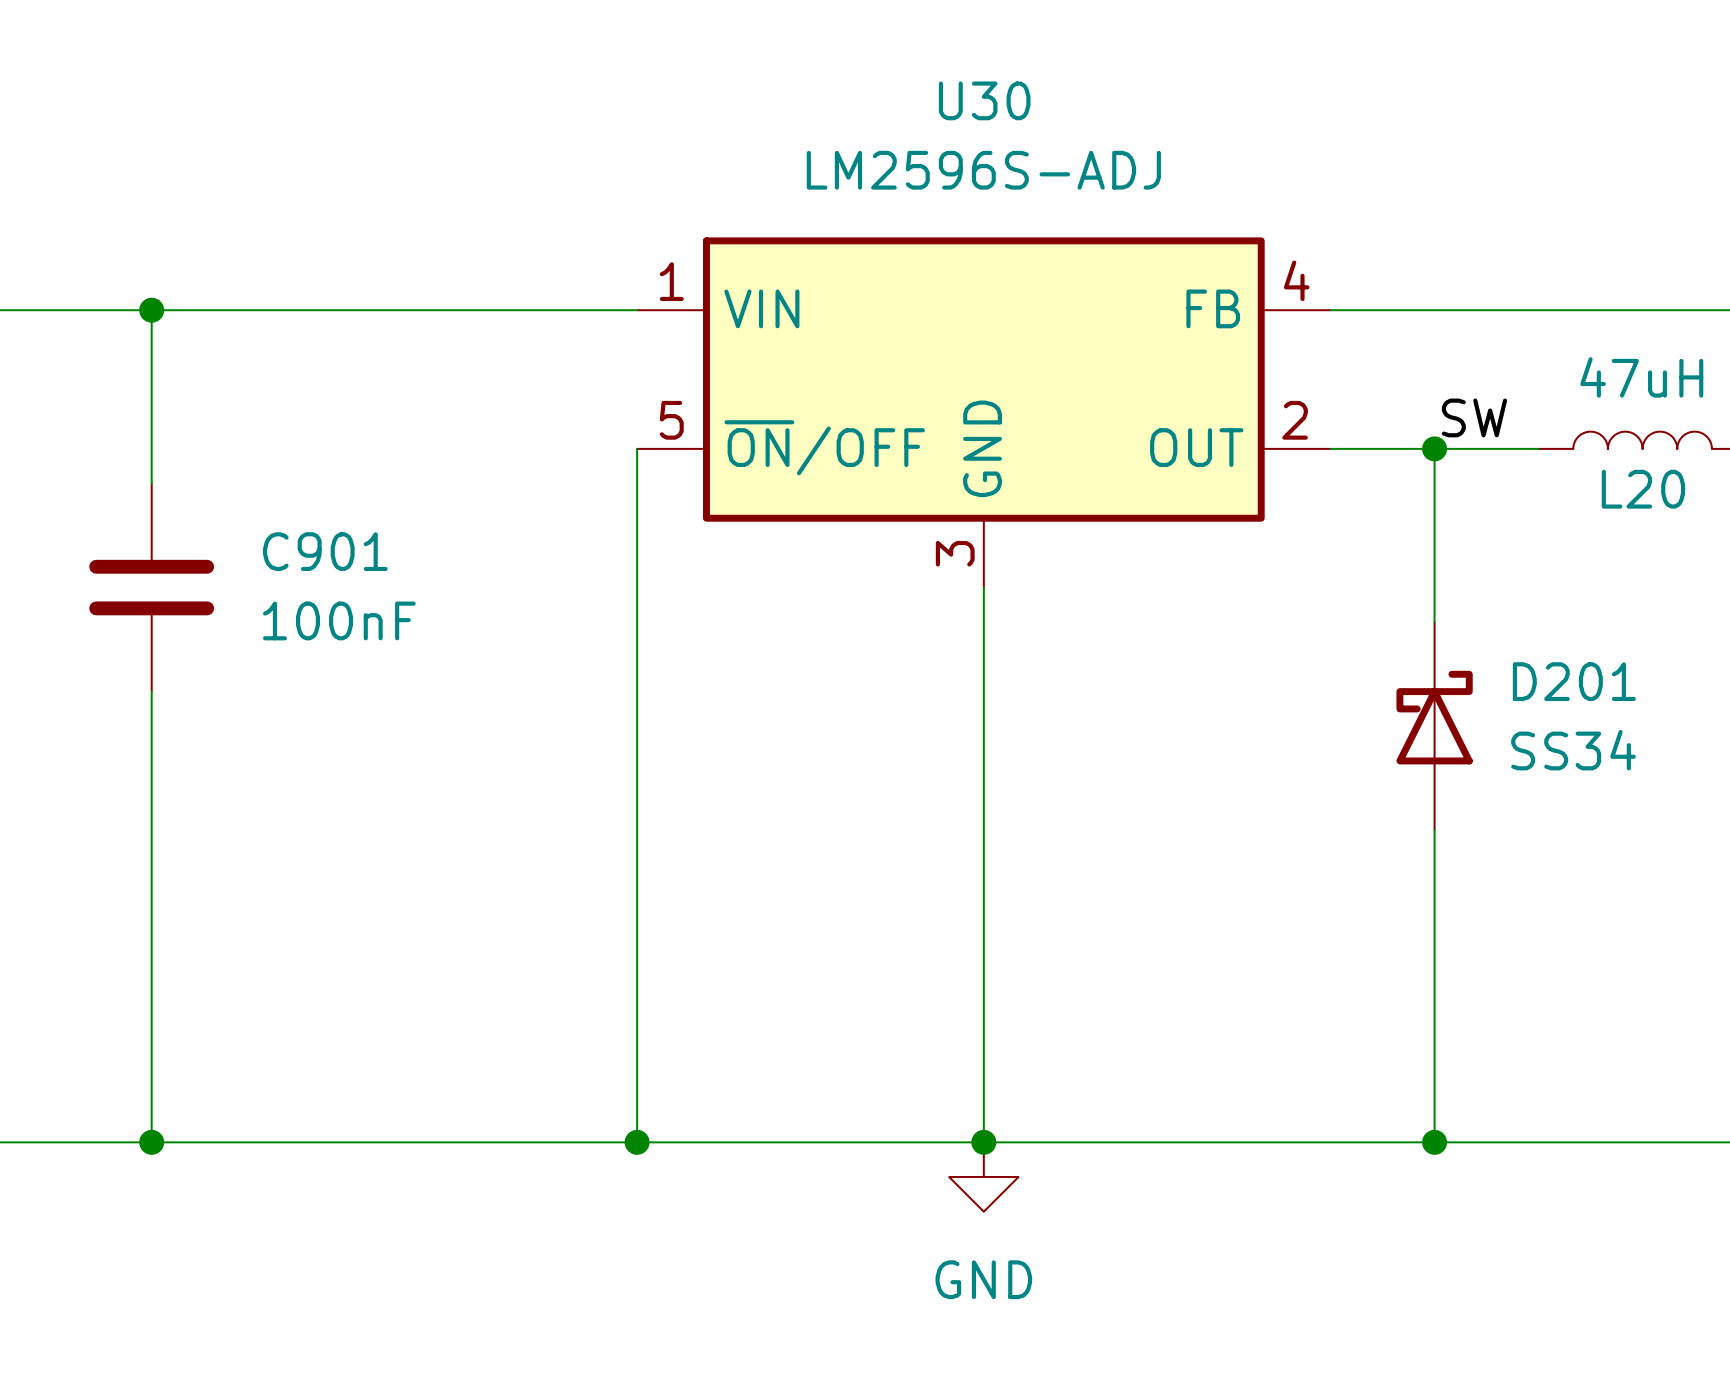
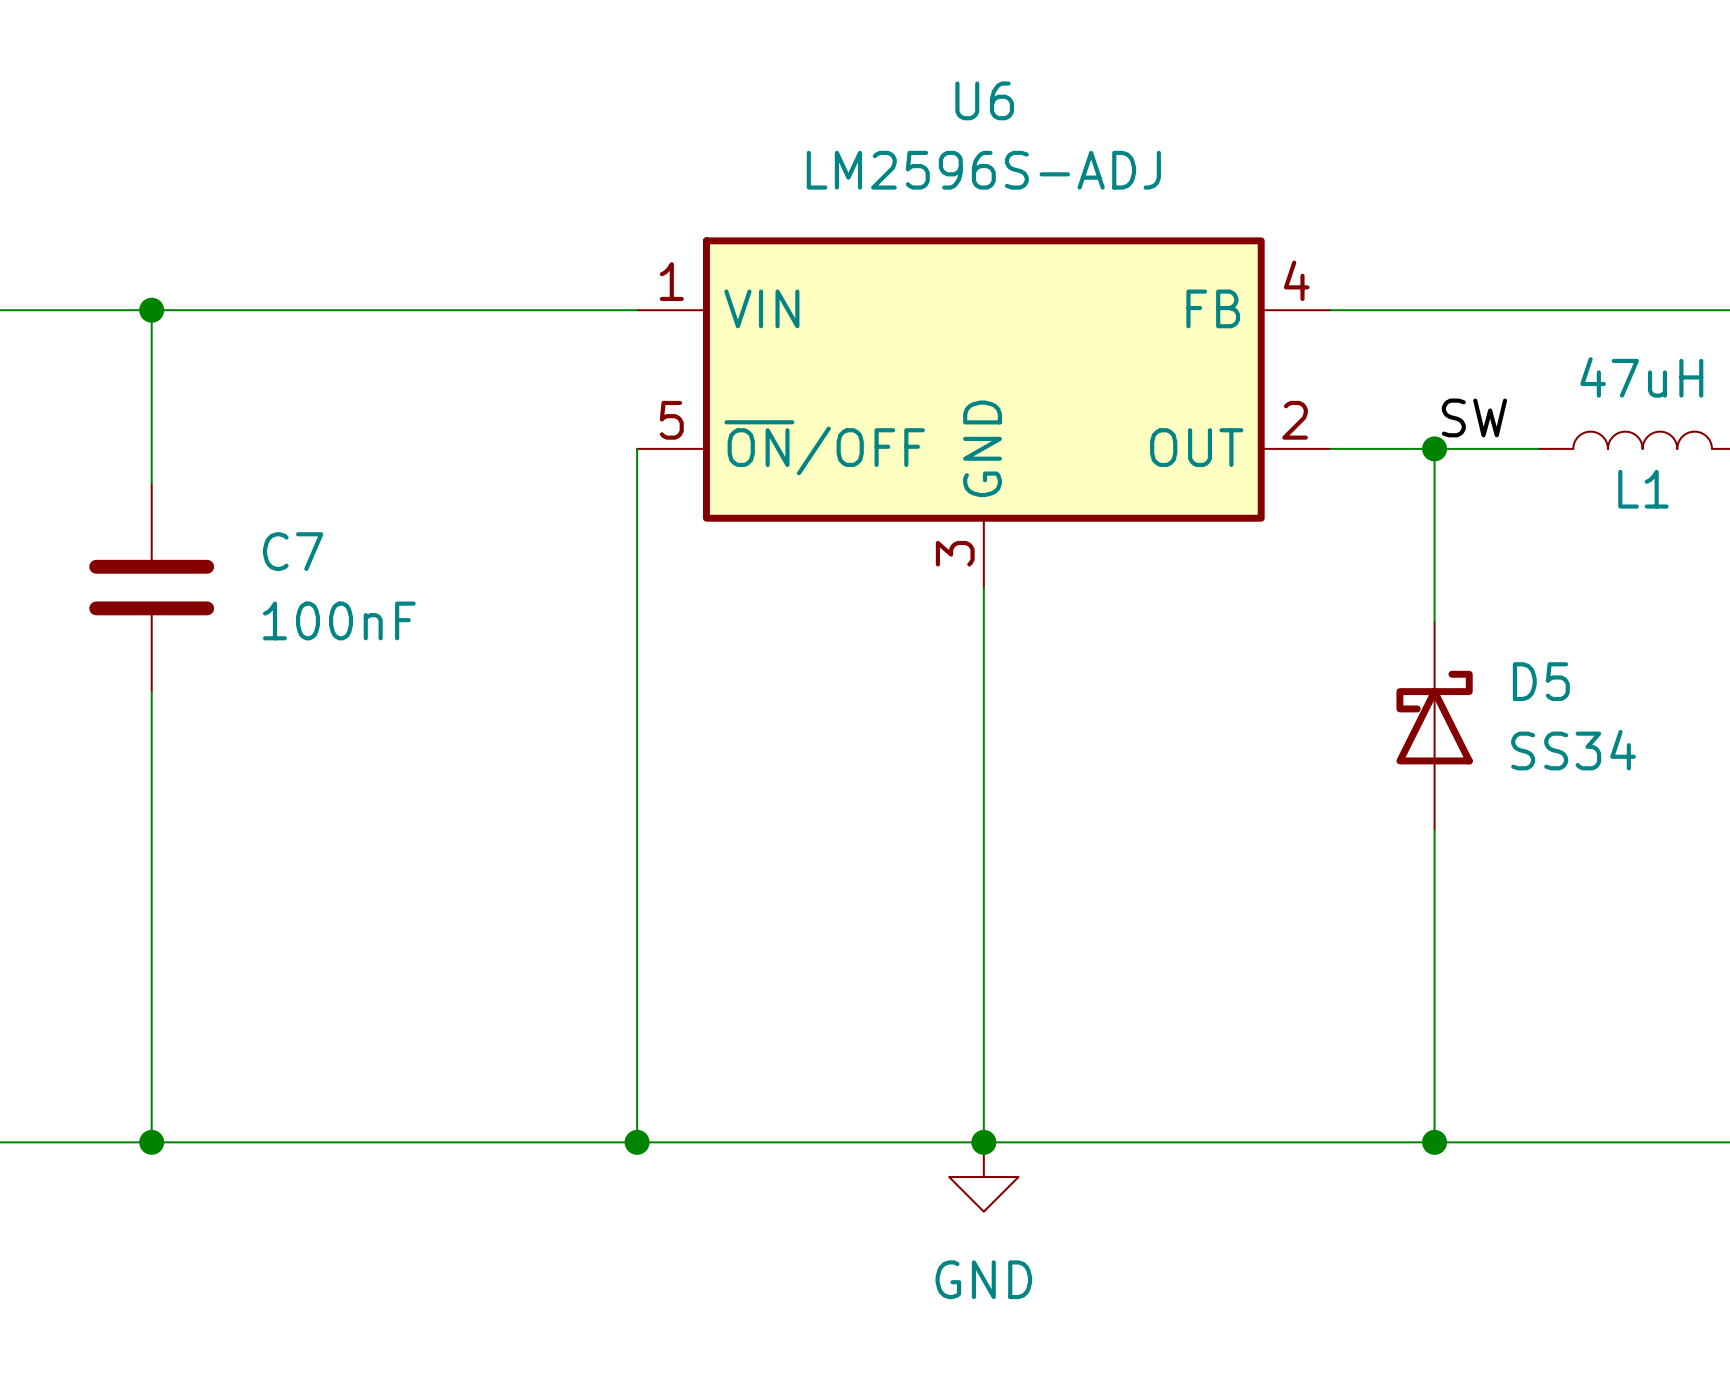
U30 name: U30 (984, 100) -> U6 (984, 100)
L20 name: L20 (1643, 489) -> L1 (1643, 489)
C901 name: C901 (325, 551) -> C7 (293, 551)
D201 name: D201 (1574, 681) -> D5 (1541, 681)

